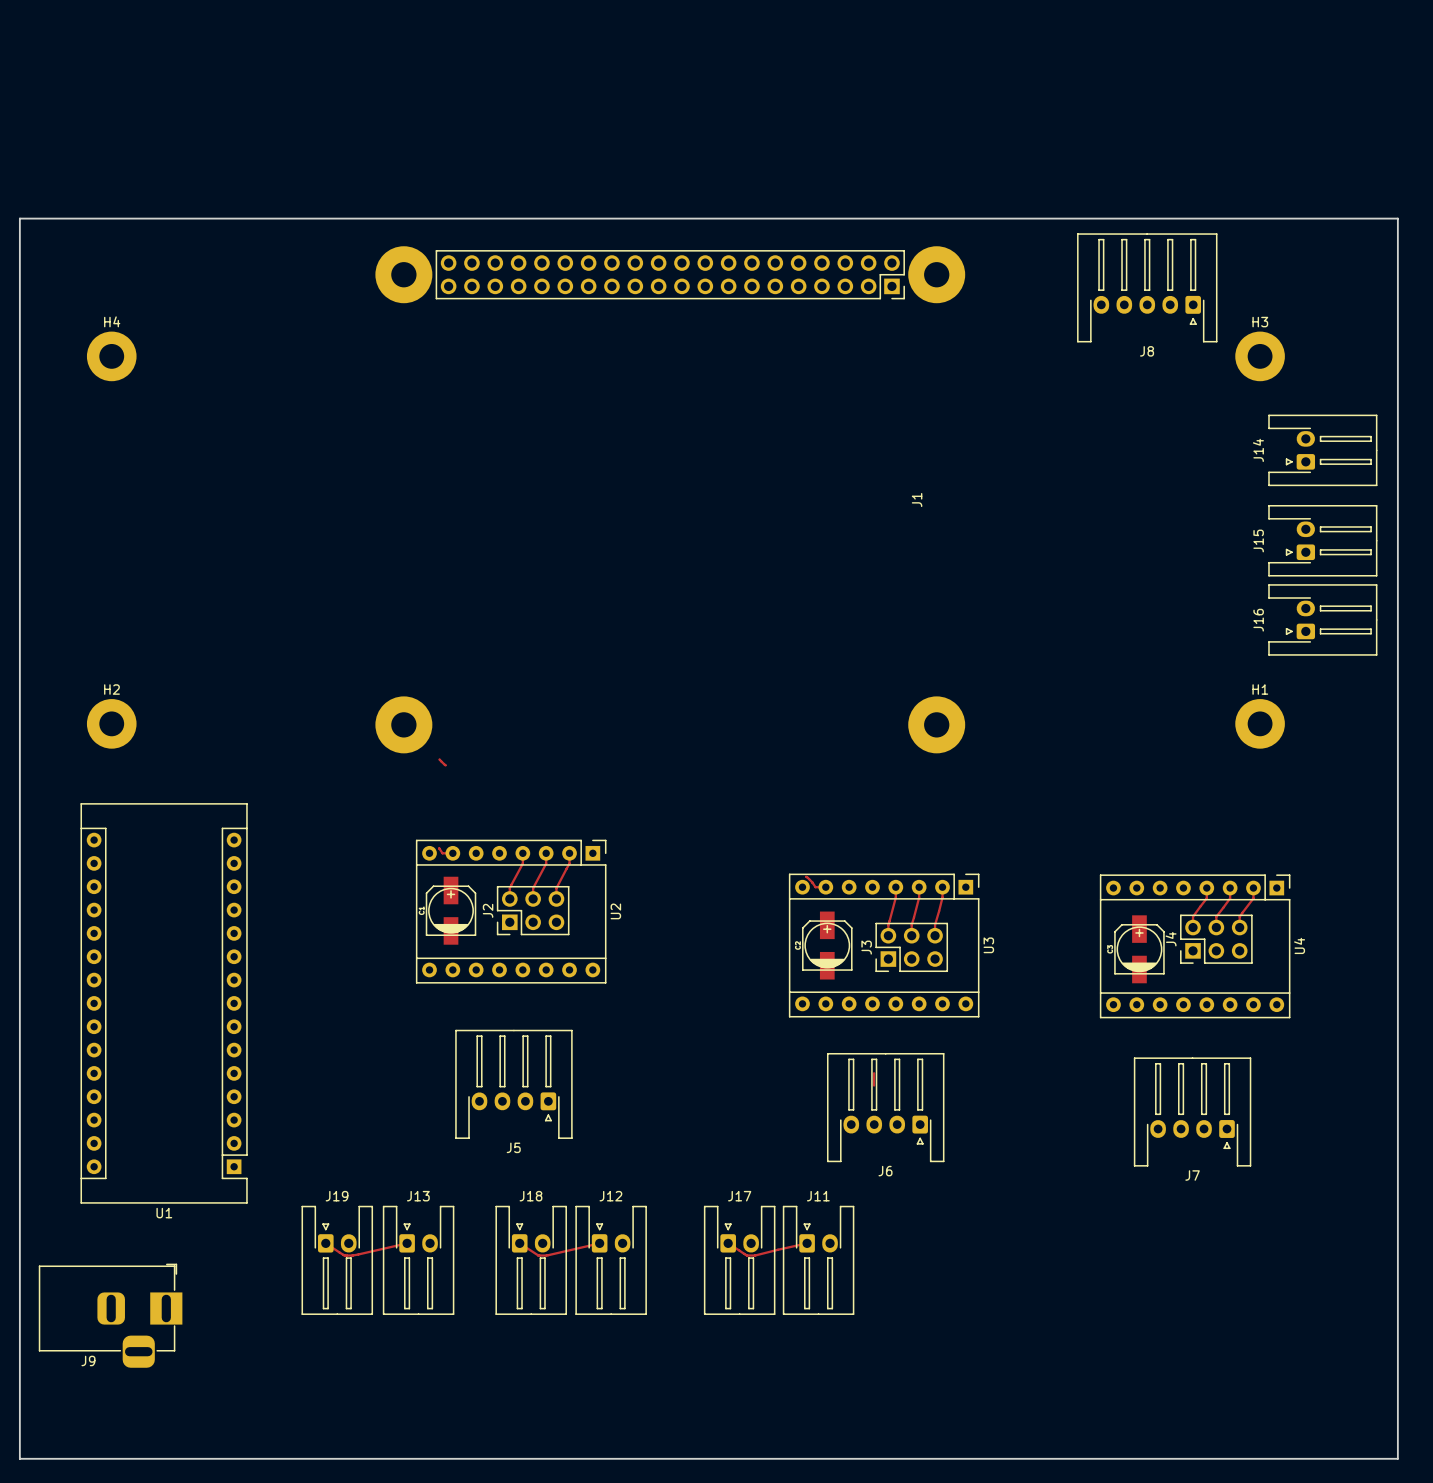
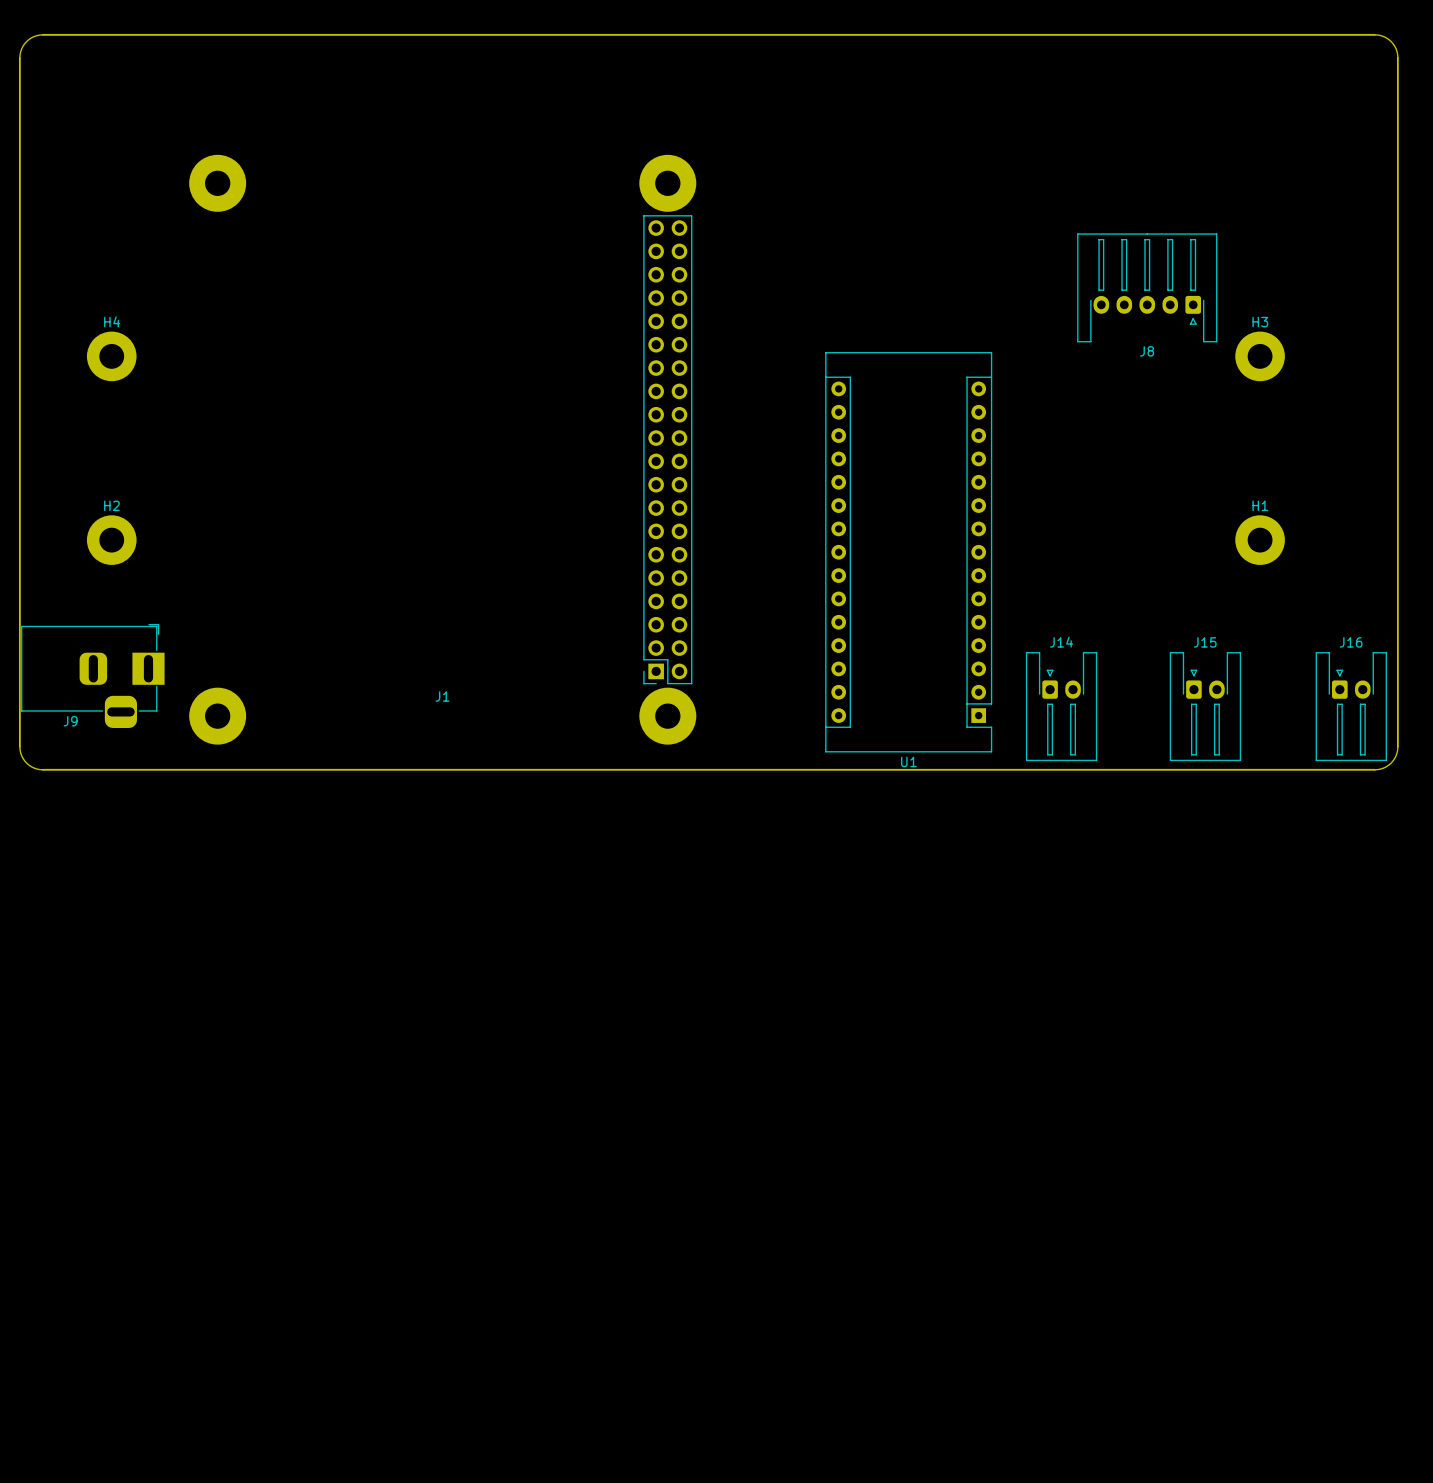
board edge: (19, 218) (1397, 218) -> (19, 218) (20, 54) (26, 41) (34, 36) (42, 34) (1377, 35) (1391, 41) (1397, 54) (1397, 218)
J14 rotation: 0° (1322, 450) -> 90° clockwise (1061, 706)
J14 position: (1322, 450) -> (1061, 706)
J1 rotation: 0° (670, 499) -> 90° clockwise (442, 449)
J15 rotation: 0° (1322, 540) -> 90° clockwise (1205, 706)
J15 position: (1322, 540) -> (1205, 706)
J16 rotation: 0° (1322, 619) -> 90° clockwise (1351, 706)
J16 position: (1322, 619) -> (1351, 706)
H2 position: (111, 723) -> (111, 540)
H1 position: (1260, 723) -> (1260, 540)
board edge: (19, 746) (19, 1458) (1397, 1458) (1397, 746) -> (19, 746) (21, 755) (26, 763) (34, 768) (42, 769) (1374, 769) (1383, 768) (1391, 763) (1396, 755) (1397, 746)
top track: (439, 759) (445, 765) -> none
top track: (439, 848) (439, 848) -> none
top track: (439, 848) (442, 853) (452, 853) -> none
top track: (522, 853) (522, 863) (509, 888) (509, 898) -> none
top track: (546, 853) (546, 863) (533, 888) (533, 898) -> none
top track: (569, 853) (569, 863) (556, 888) (556, 898) -> none
top track: (806, 876) (815, 887) (825, 887) -> none
top track: (895, 887) (895, 897) (888, 924) (888, 935) -> none
top track: (919, 887) (919, 897) (911, 924) (911, 935) -> none
top track: (942, 887) (942, 897) (935, 924) (935, 935) -> none
top track: (1206, 888) (1206, 898) (1193, 916) (1193, 927) -> none
top track: (1230, 888) (1230, 898) (1216, 916) (1216, 927) -> none
top track: (1253, 888) (1253, 898) (1239, 916) (1239, 927) -> none
part: (451, 910) -> none
J2: (533, 910) -> none
U2: (511, 911) -> none
J4: (1216, 939) -> none
part: (827, 945) -> none
U3: (884, 945) -> none
U4: (1195, 946) -> none
J3: (911, 947) -> none
part: (1139, 949) -> none
U1 position: (164, 1003) -> (908, 552)
top track: (874, 1073) (874, 1085) -> none
J5: (513, 1084) -> none
J6: (885, 1107) -> none
J7: (1192, 1112) -> none
top track: (325, 1243) (347, 1255) (407, 1243) -> none
top track: (519, 1243) (539, 1255) (599, 1243) -> none
top track: (728, 1243) (747, 1255) (755, 1255) (807, 1243) -> none
J19: (337, 1260) -> none
J13: (418, 1260) -> none
J18: (531, 1260) -> none
J12: (611, 1260) -> none
J17: (739, 1260) -> none
J11: (818, 1260) -> none
J9 position: (110, 1315) -> (92, 676)

